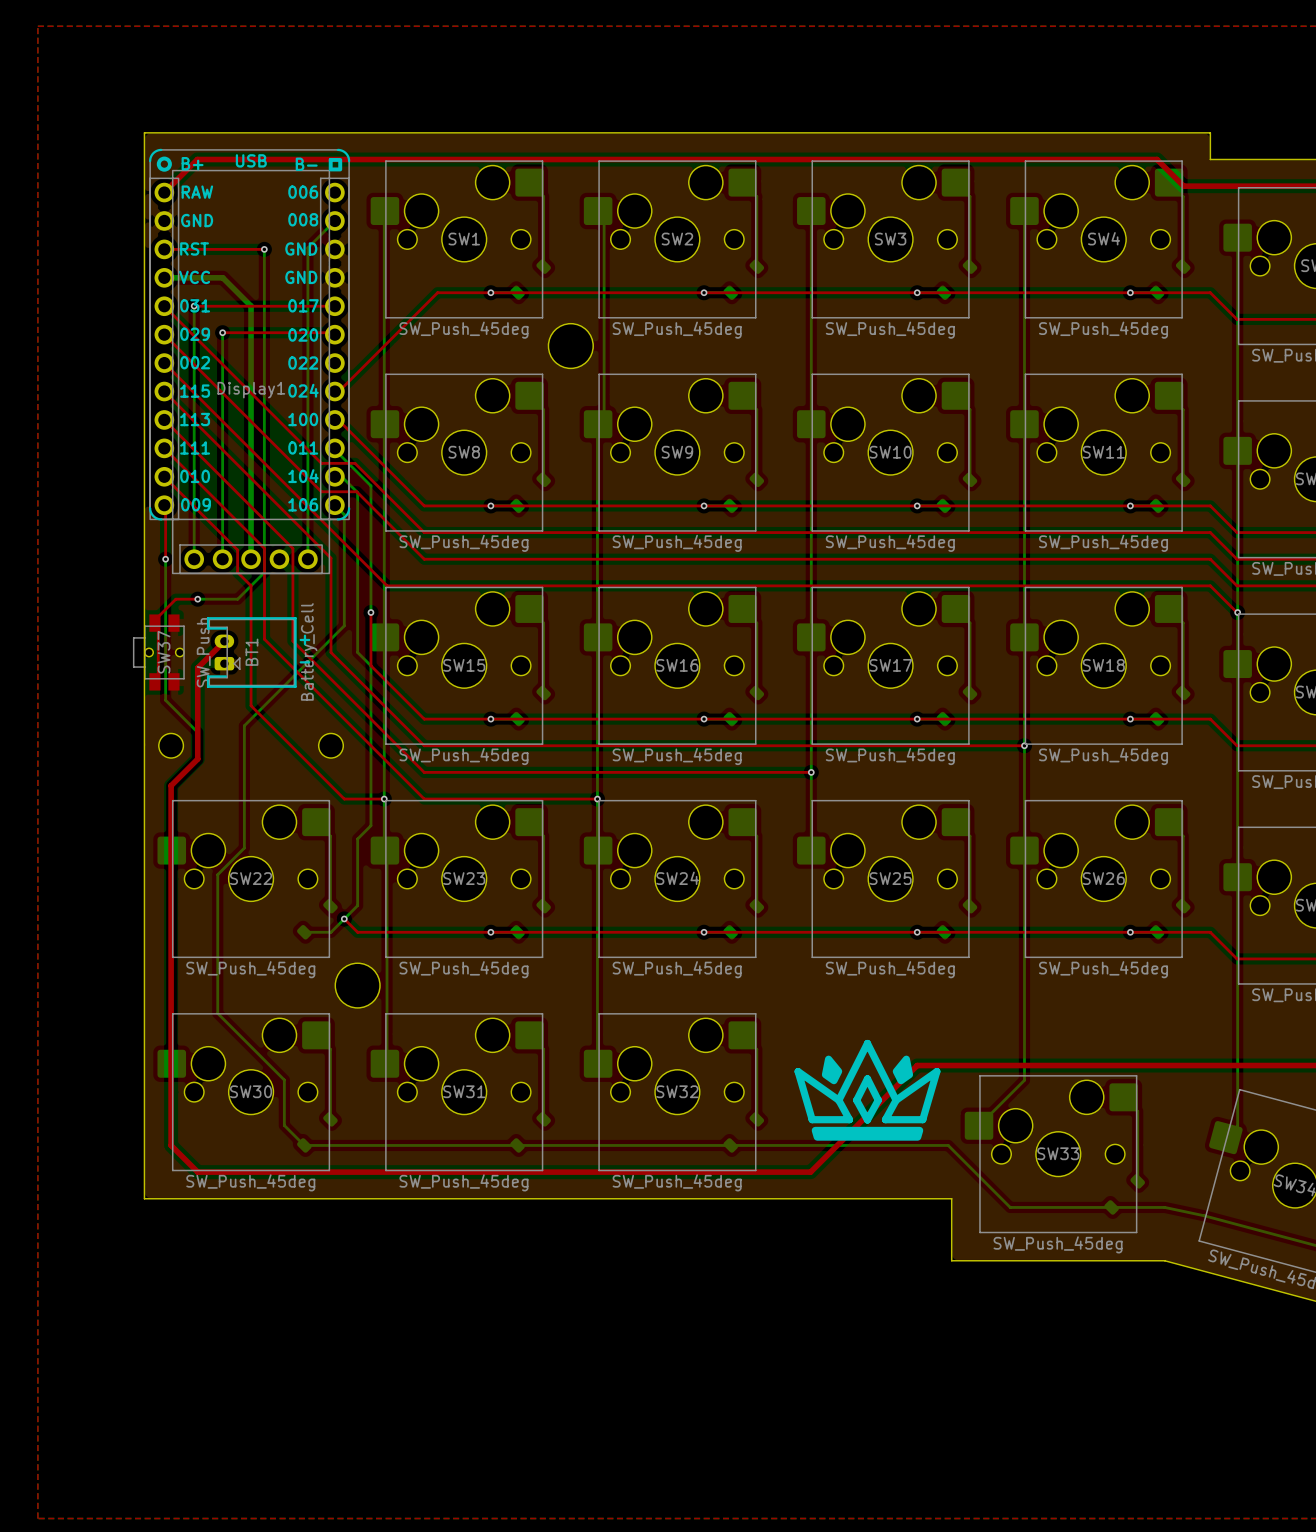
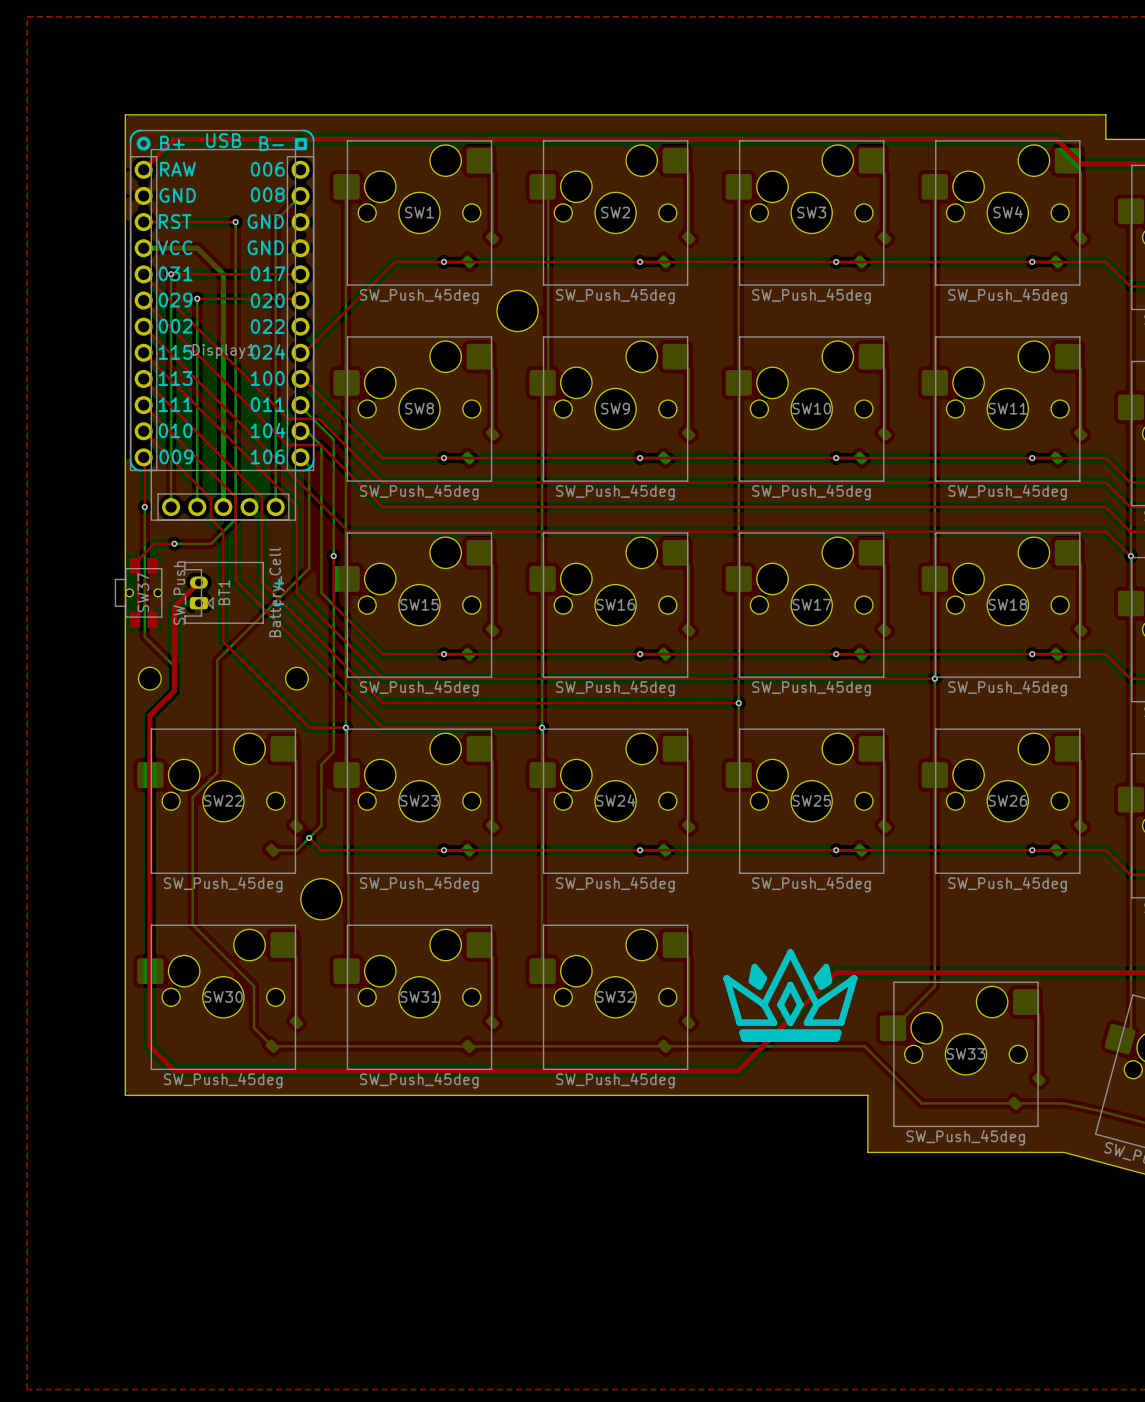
part footprint: [149, 148, 351, 521] -> [129, 129, 315, 472]
BT1 footprint: [206, 617, 297, 688] -> [184, 561, 264, 624]

